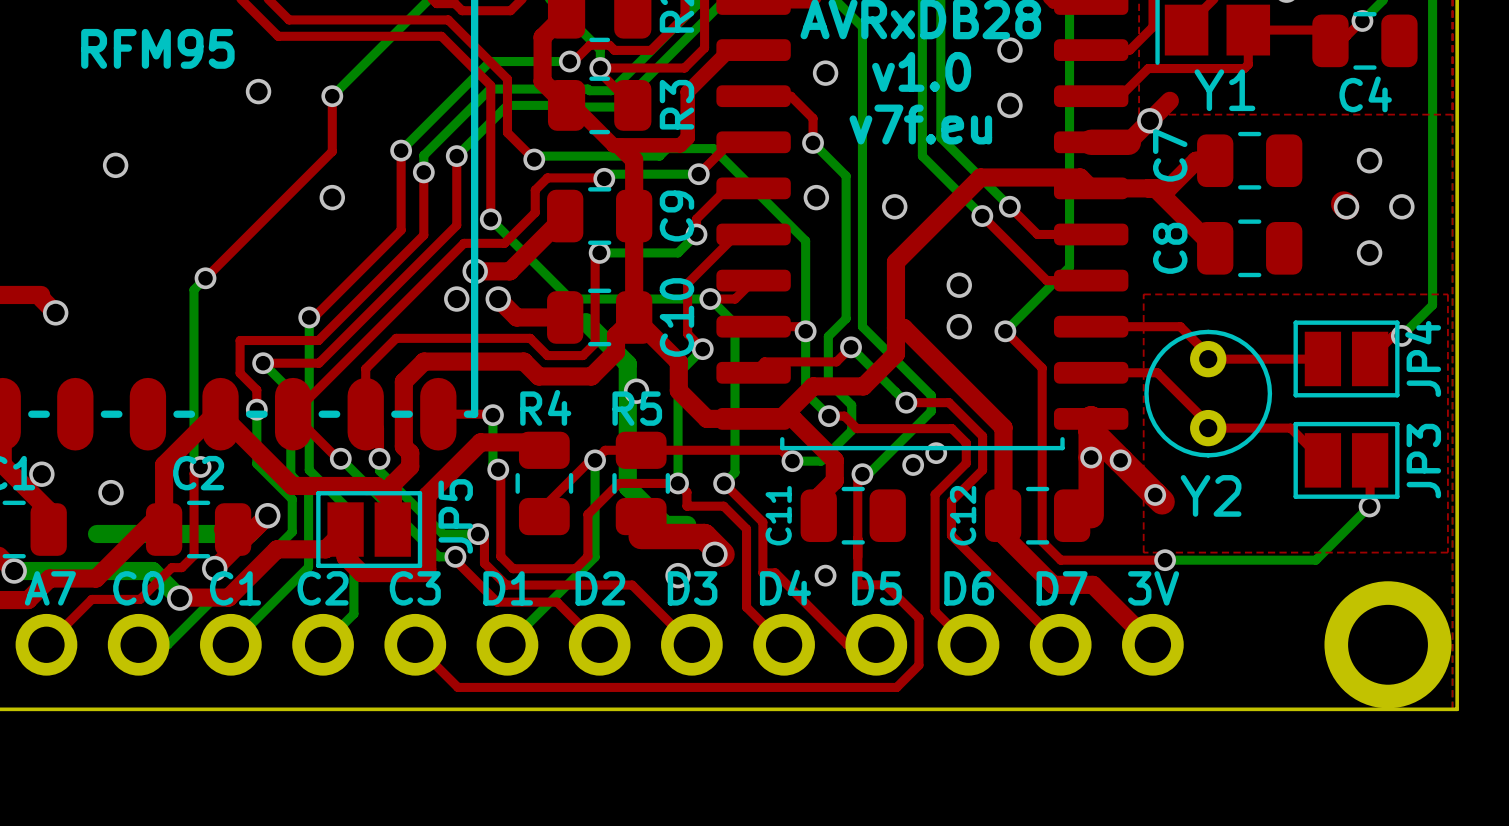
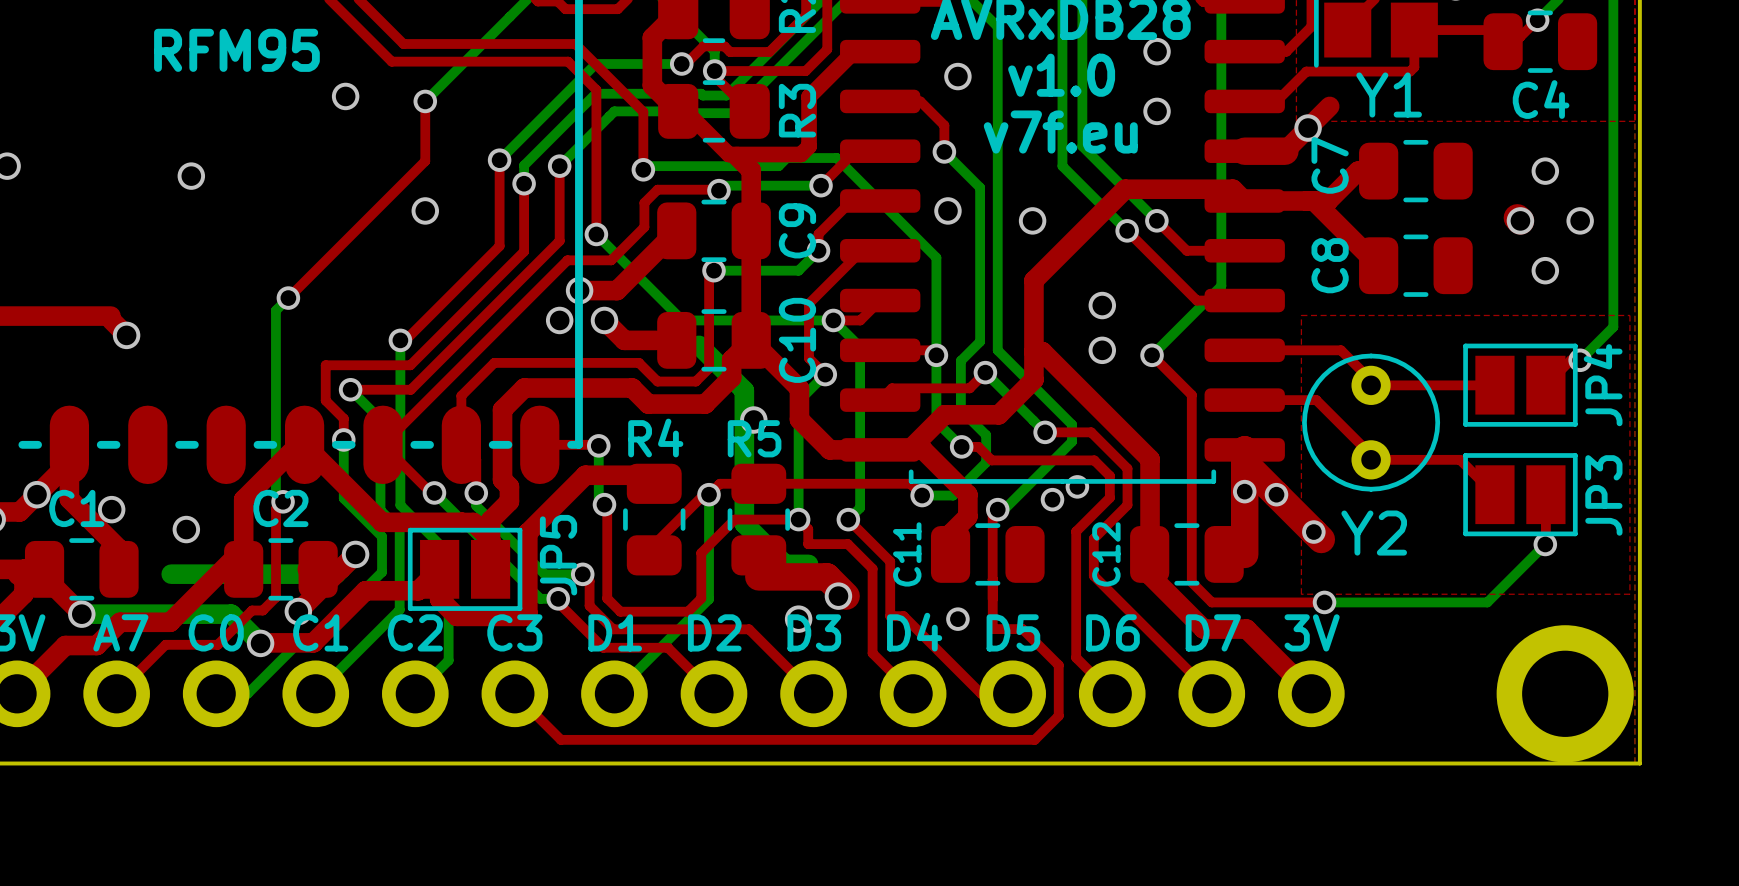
top track: (289, 19) (448, 19) (471, 43) -> (378, 19) (403, 44) (575, 44)
top track: (278, 36) (441, 36) (464, 59) -> (366, 36) (391, 61) (568, 61)
top track: (507, 79) (507, 132) (534, 159) -> (614, 83) (643, 111) (643, 169)

